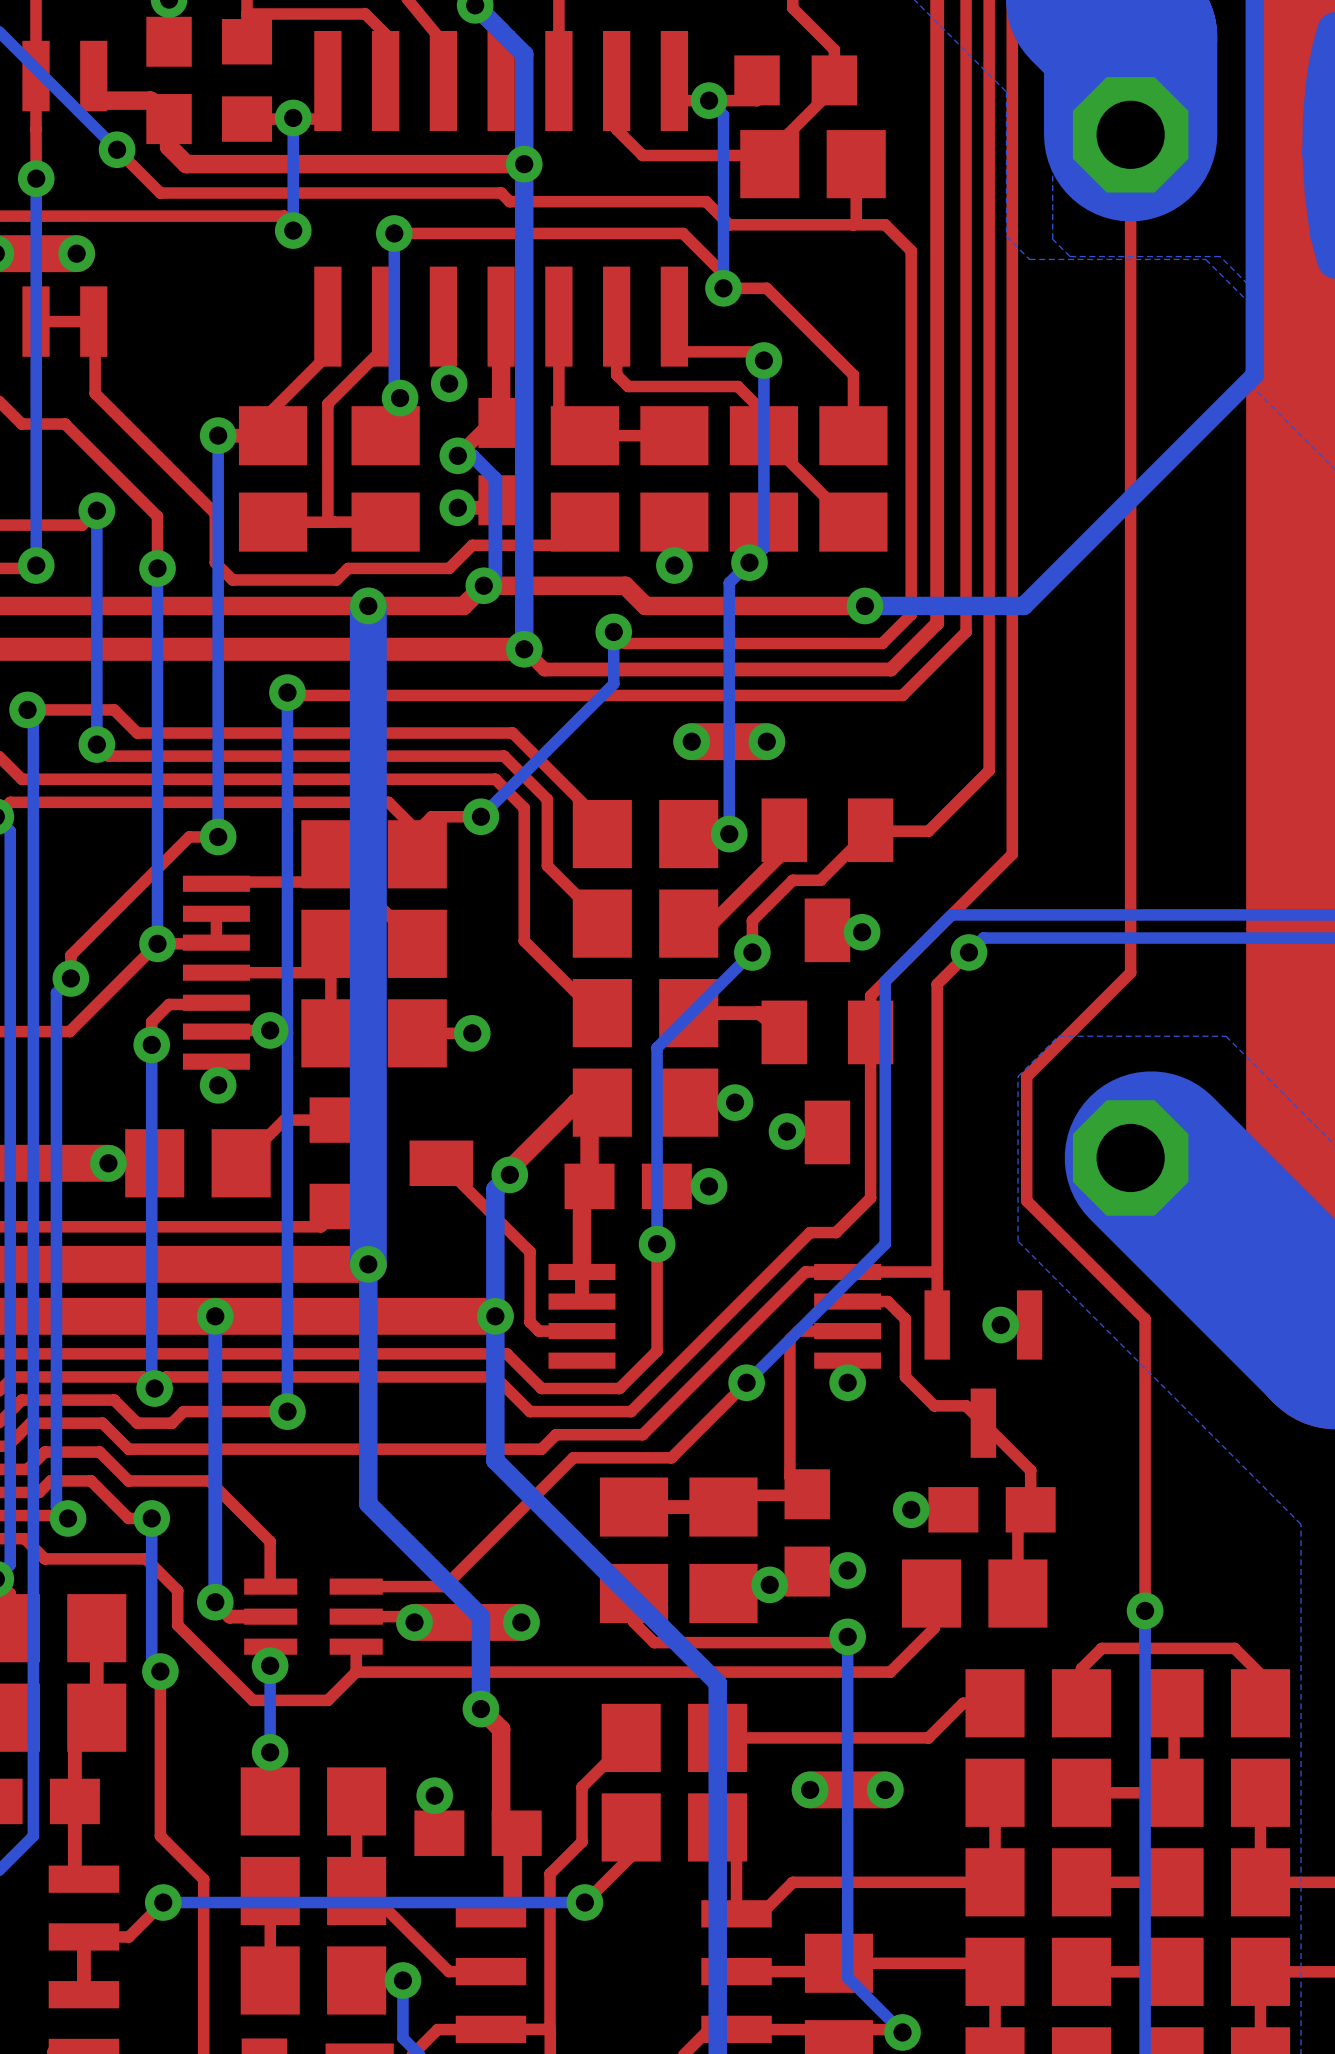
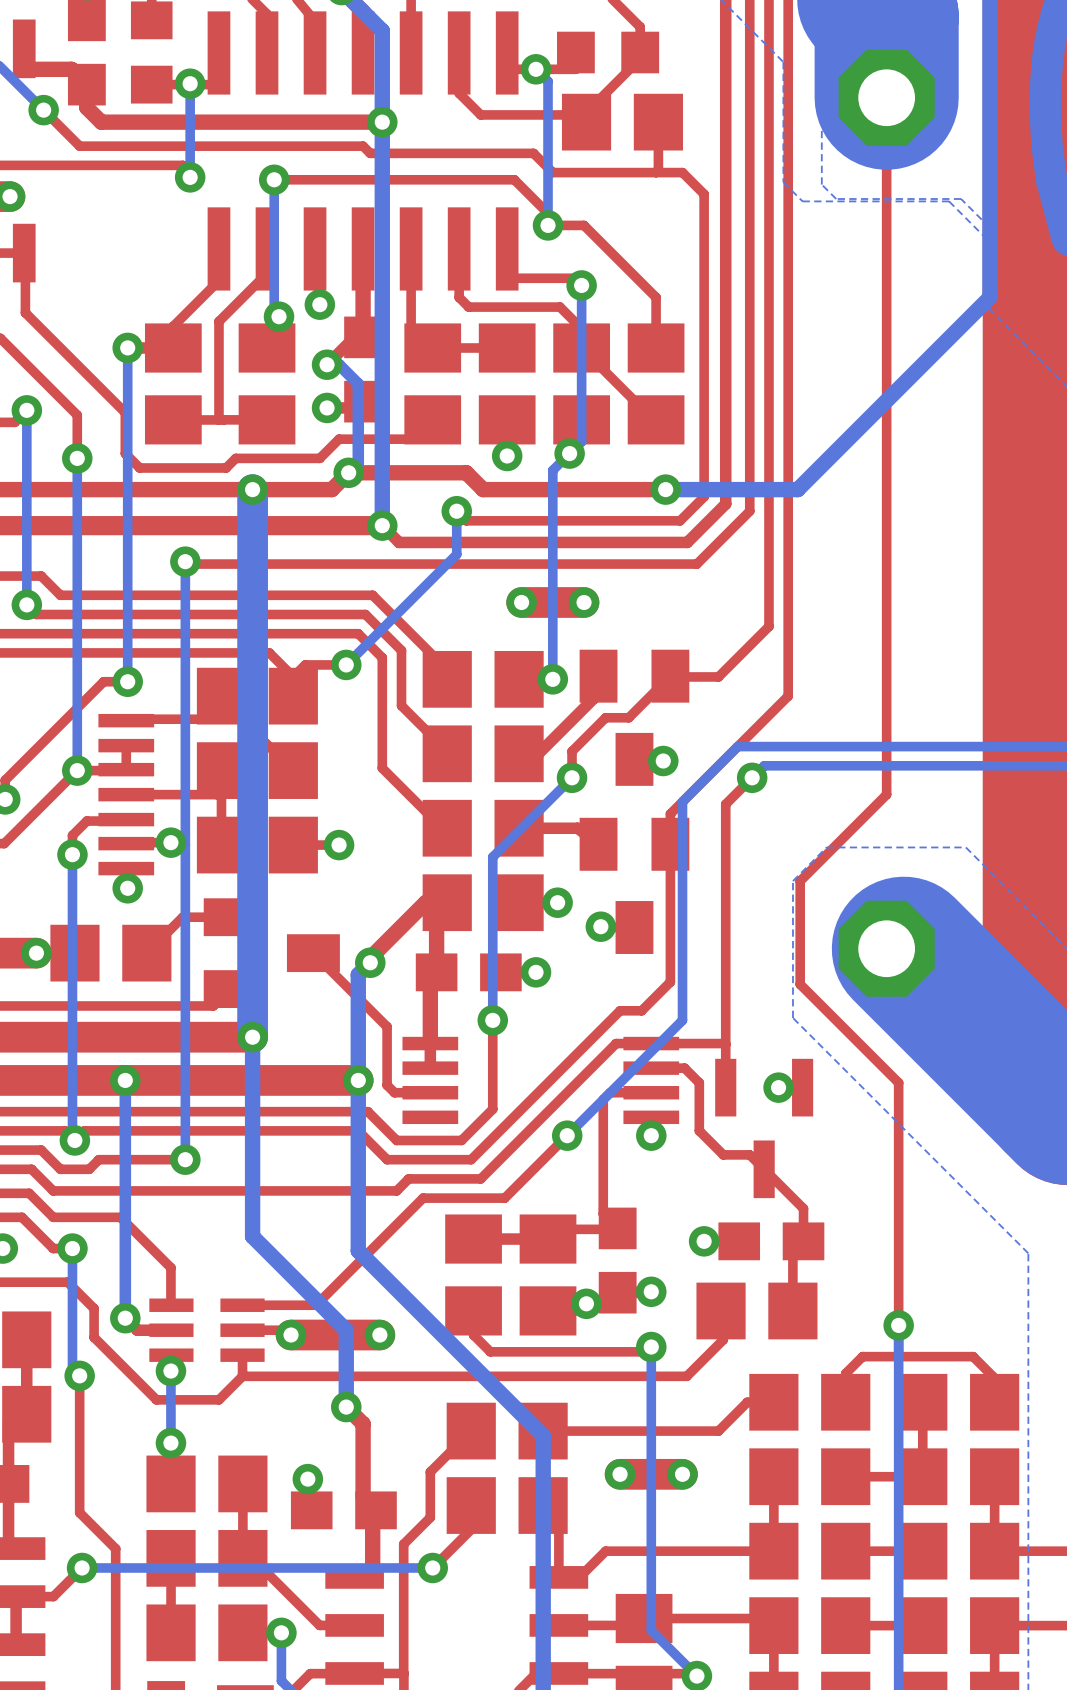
bottom track: (495, 1460) (717, 1683) (717, 1743) -> (358, 1200) (358, 1250) (543, 1435)

